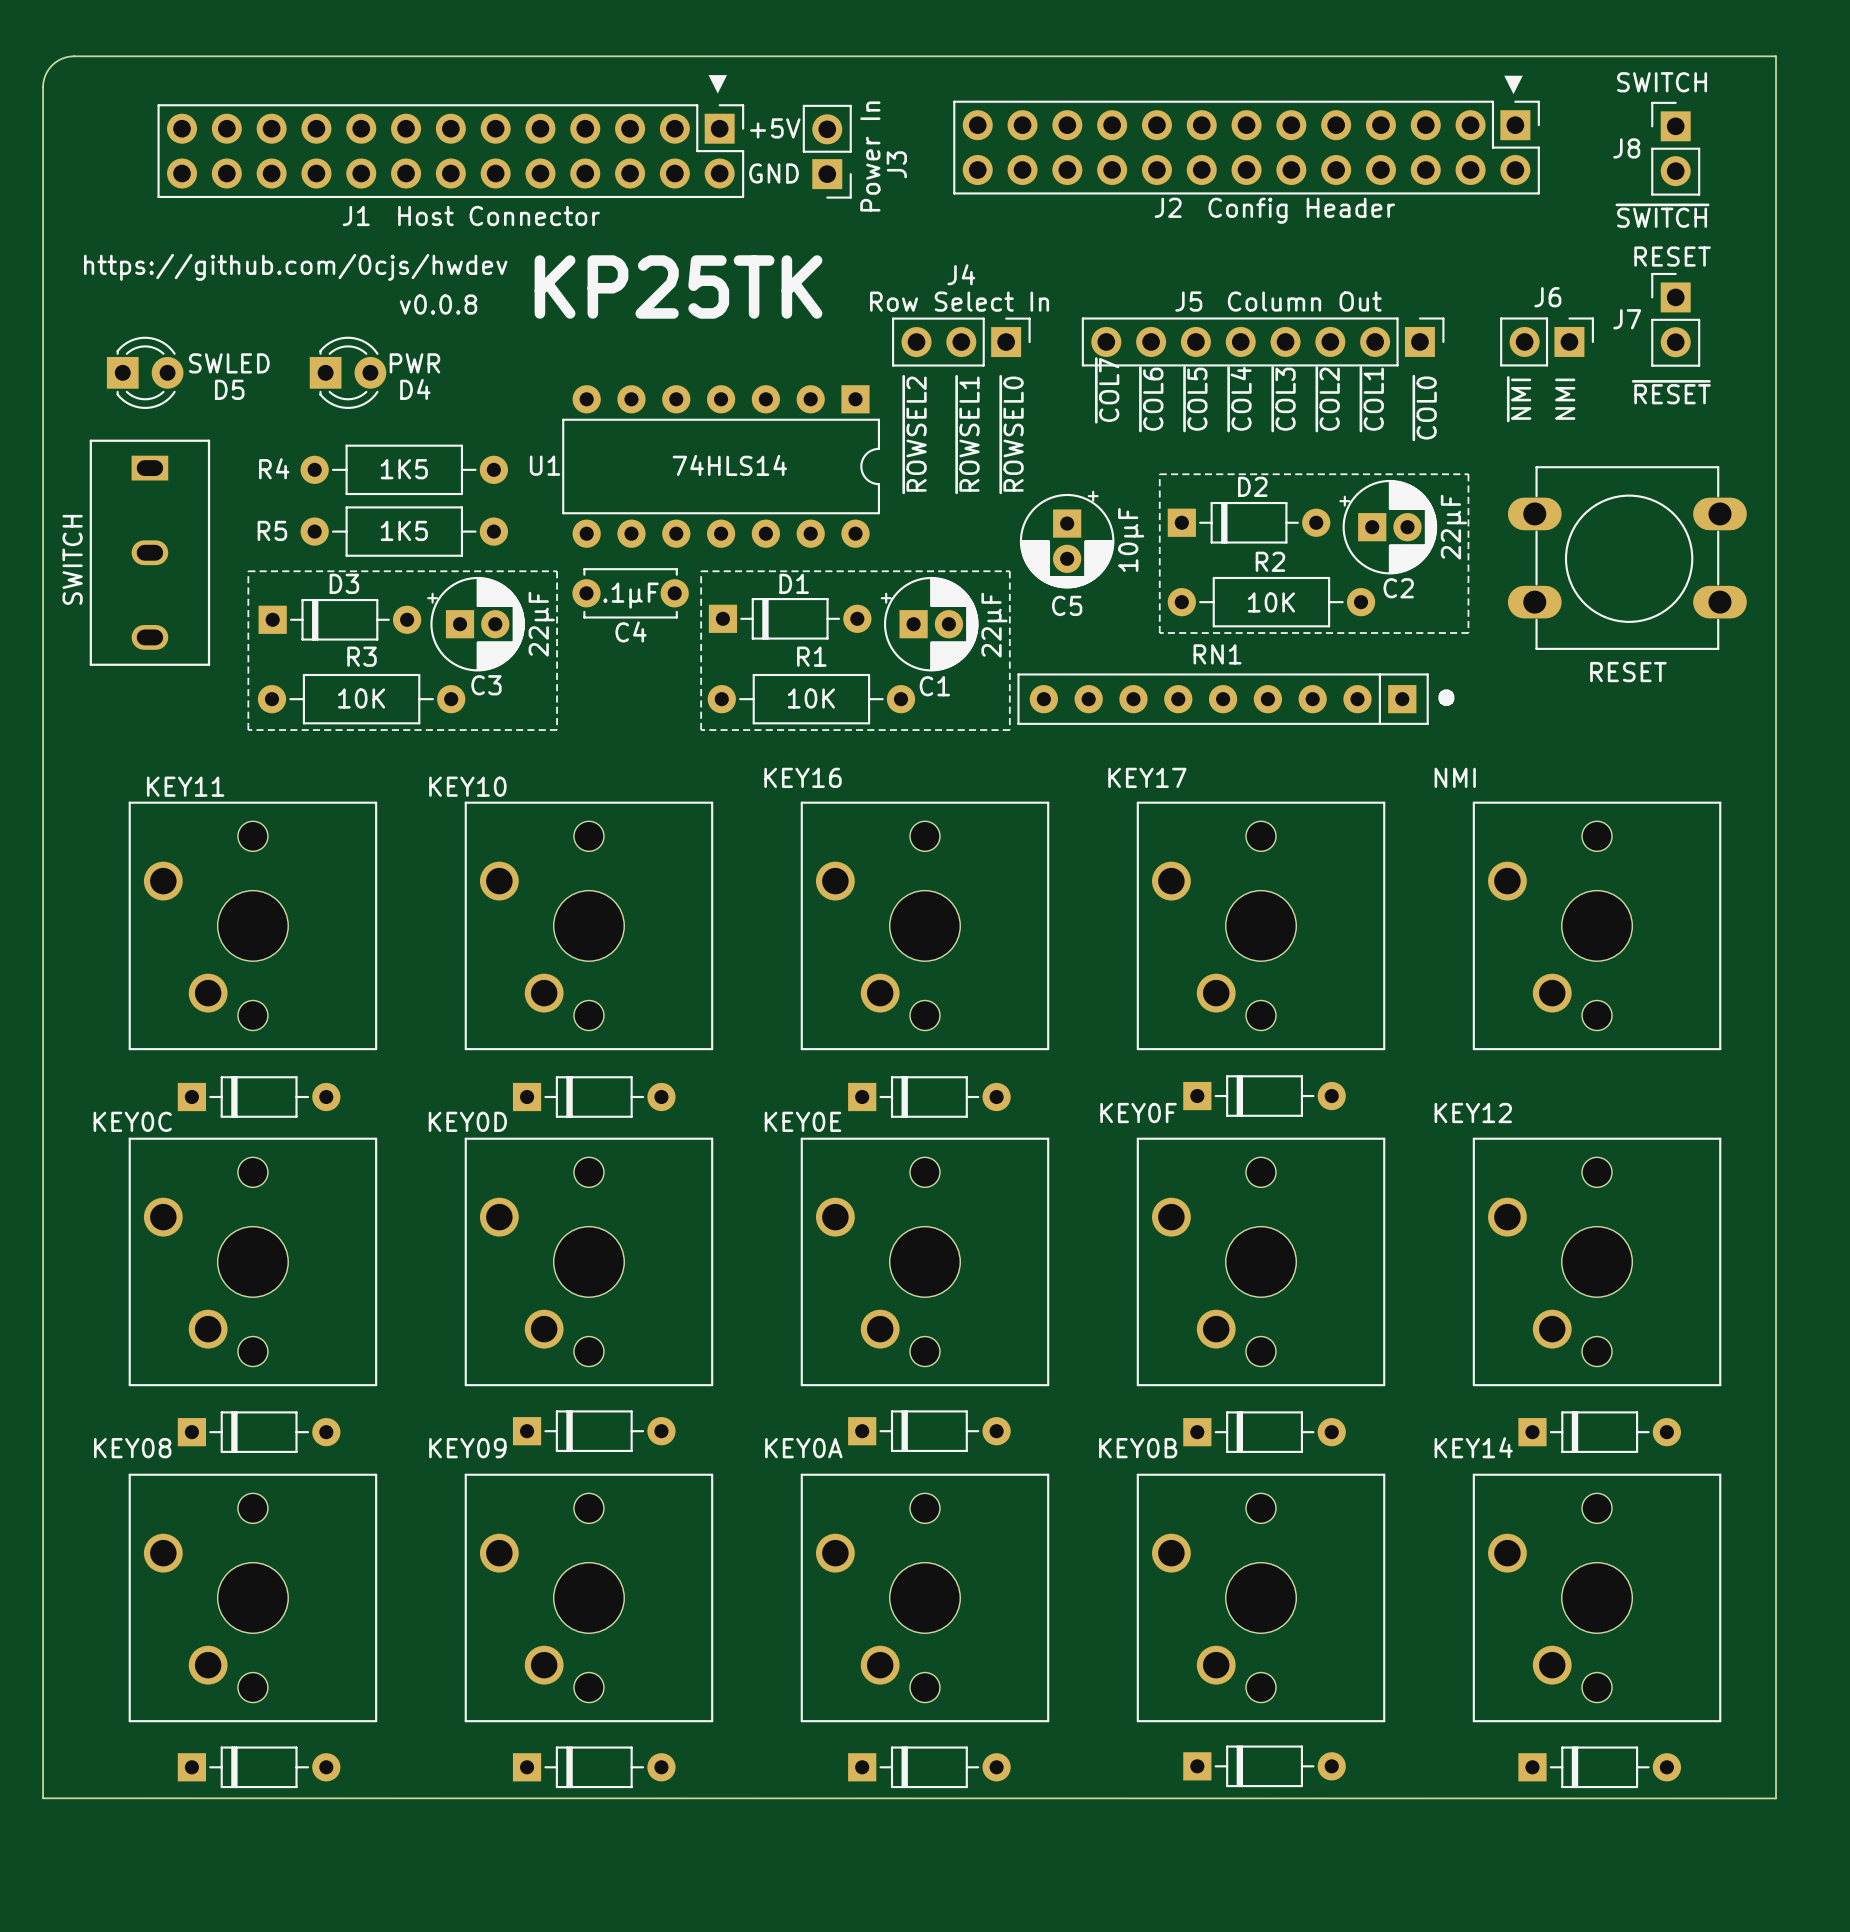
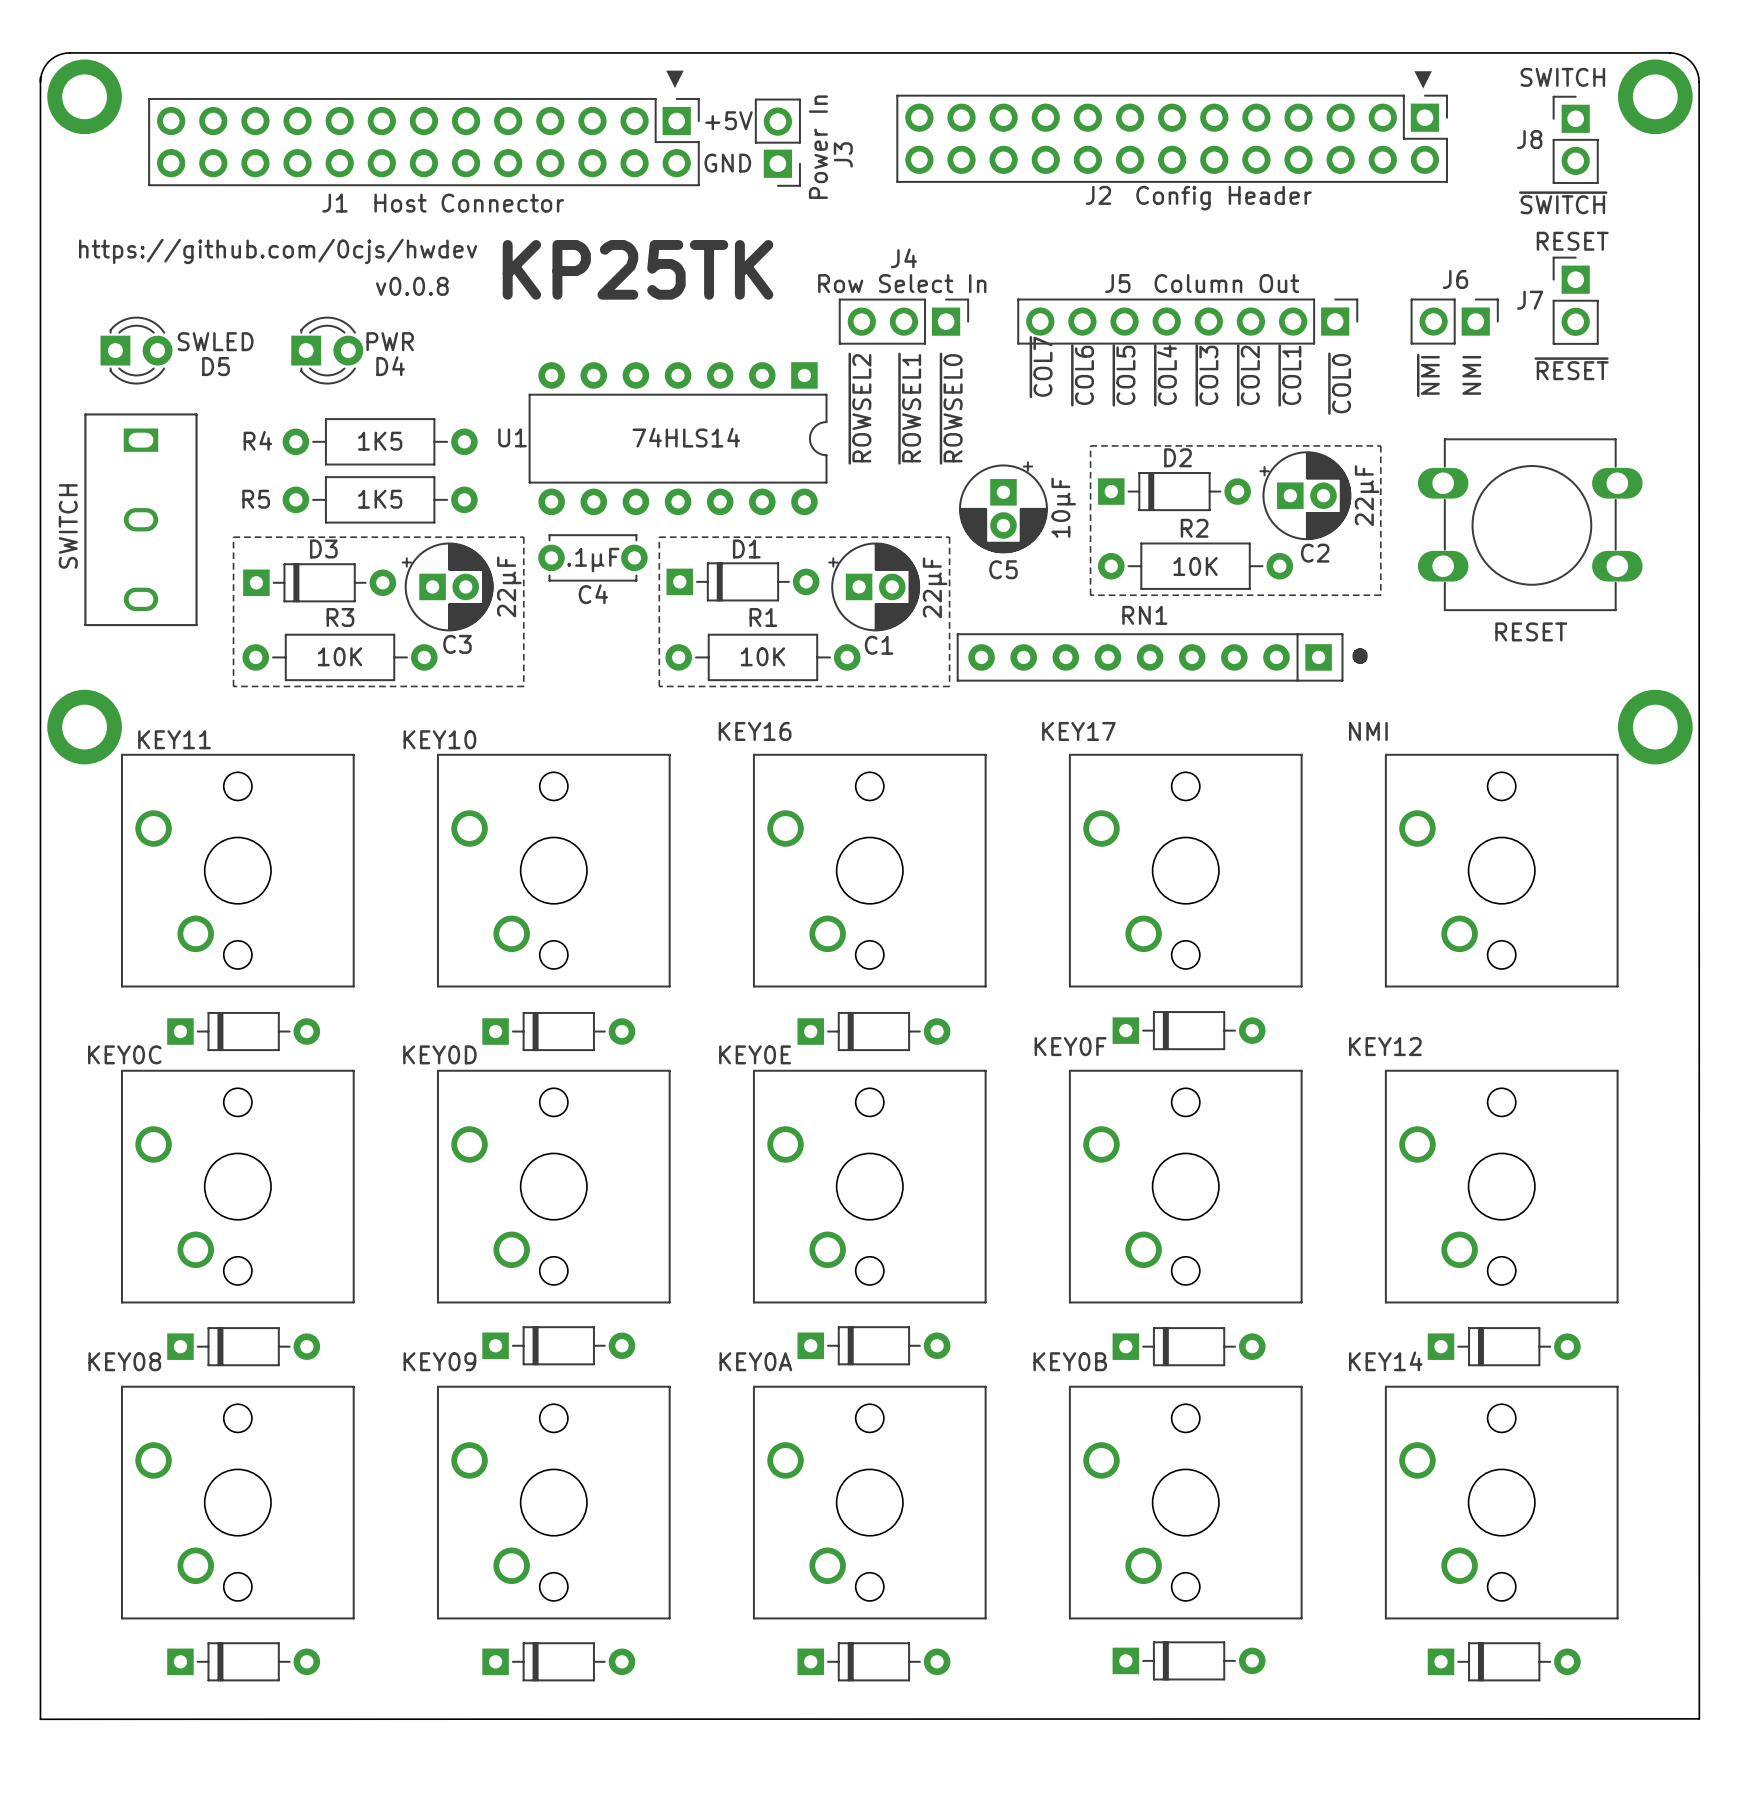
board edge: (1776, 56) (1776, 1798) (43, 1798) (43, 87) -> (1669, 52) (1681, 55) (1690, 61) (1696, 70) (1699, 81) (1699, 1718) (40, 1719) (40, 77)
part: none -> (84, 96)
part: none -> (1655, 96)
part: none -> (84, 727)
part: none -> (1655, 727)

